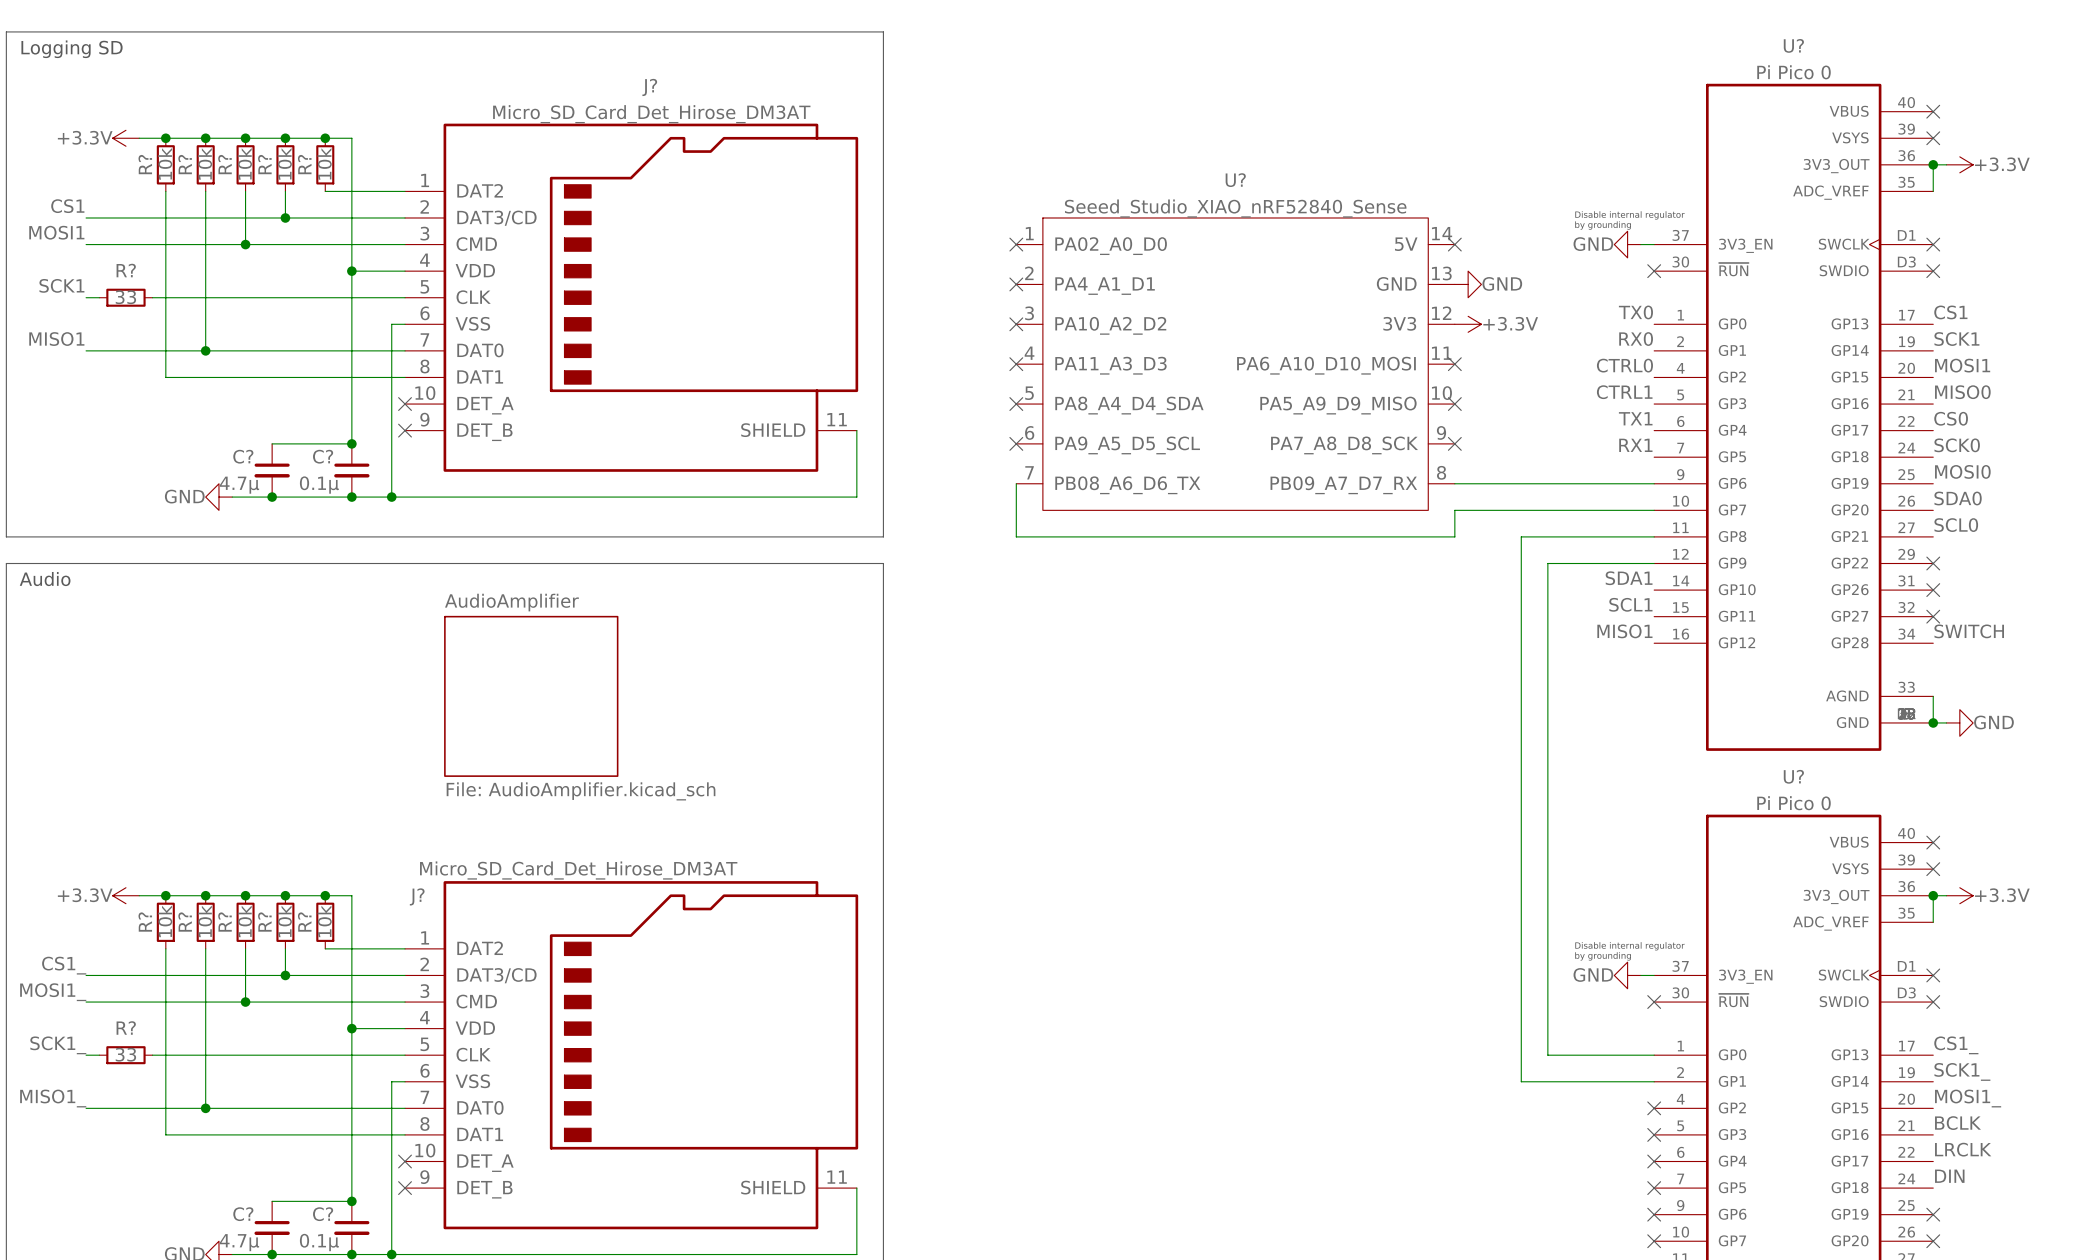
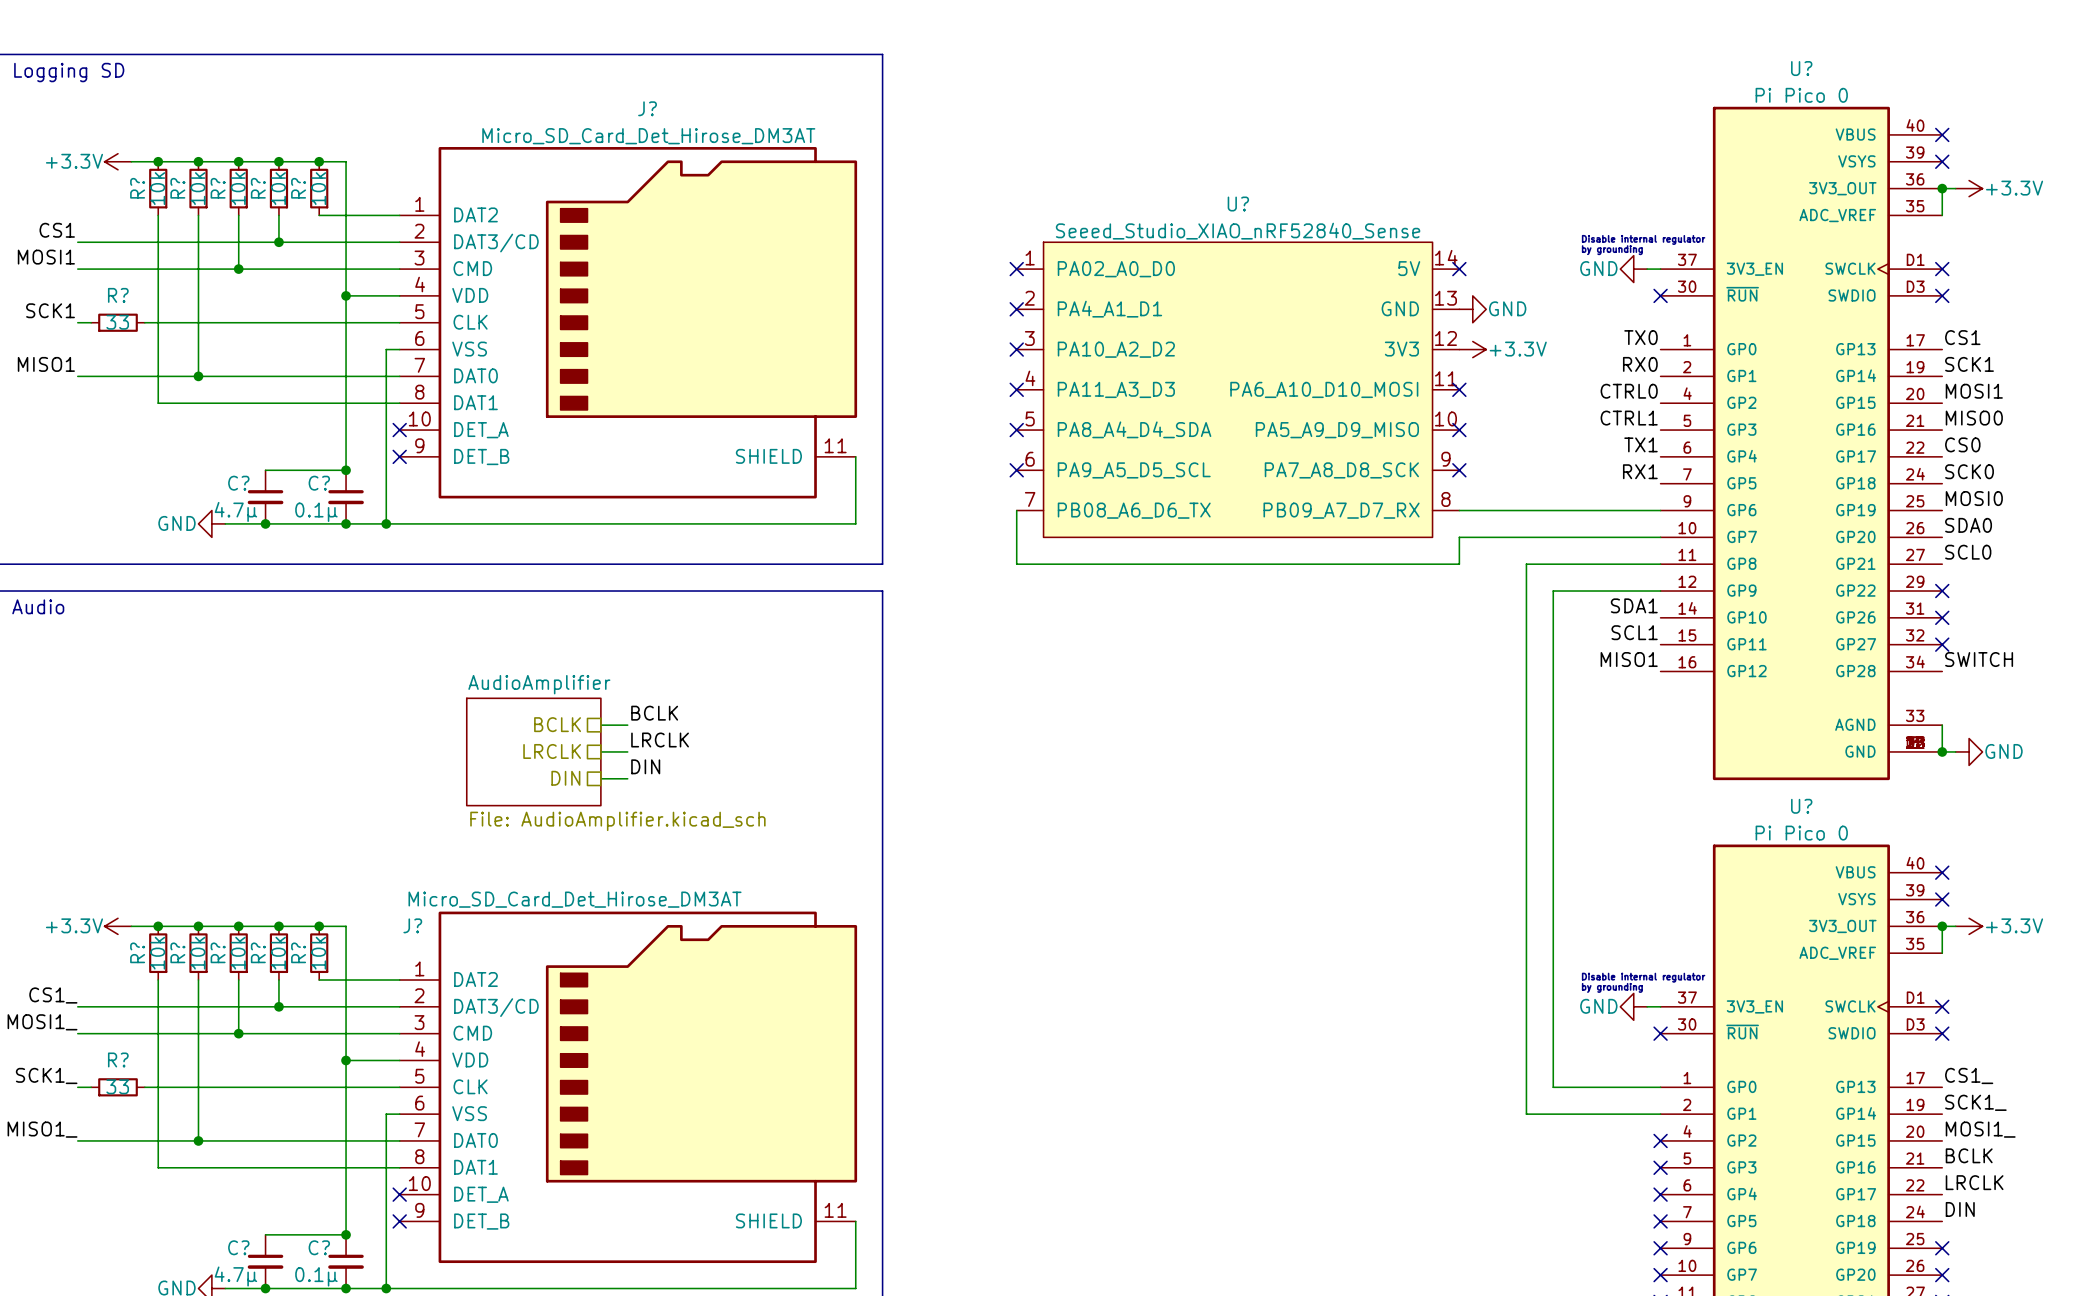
label: none -> BCLK (654, 713)
hierarchical label: none -> BCLK (557, 724)
sheet AudioAmplifier: File: AudioAmplifier.kicad_sch (531, 696) -> none
wire: none -> (600, 725) (627, 725)
label: none -> LRCLK (660, 740)
sheet AudioAmplifier: none -> File: AudioAmplifier.kicad_sch (533, 751)
hierarchical label: none -> LRCLK (552, 751)
wire: none -> (600, 751) (627, 751)
label: none -> DIN (645, 766)
hierarchical label: none -> DIN (565, 778)
wire: none -> (600, 778) (627, 778)

